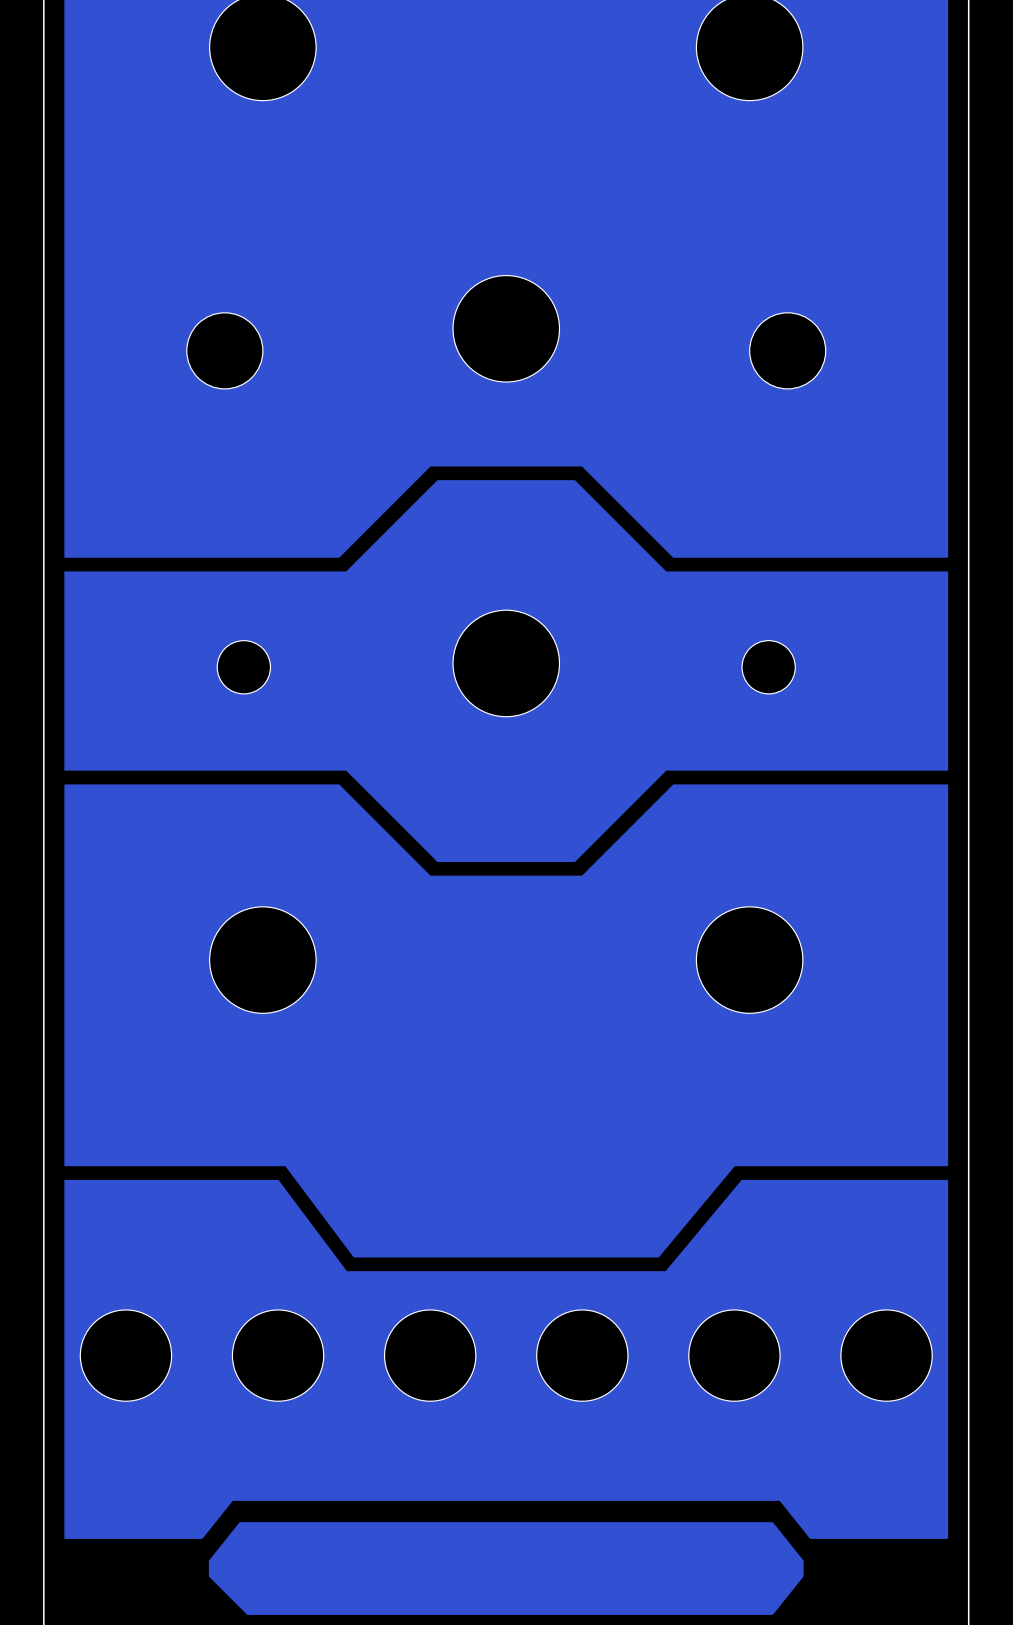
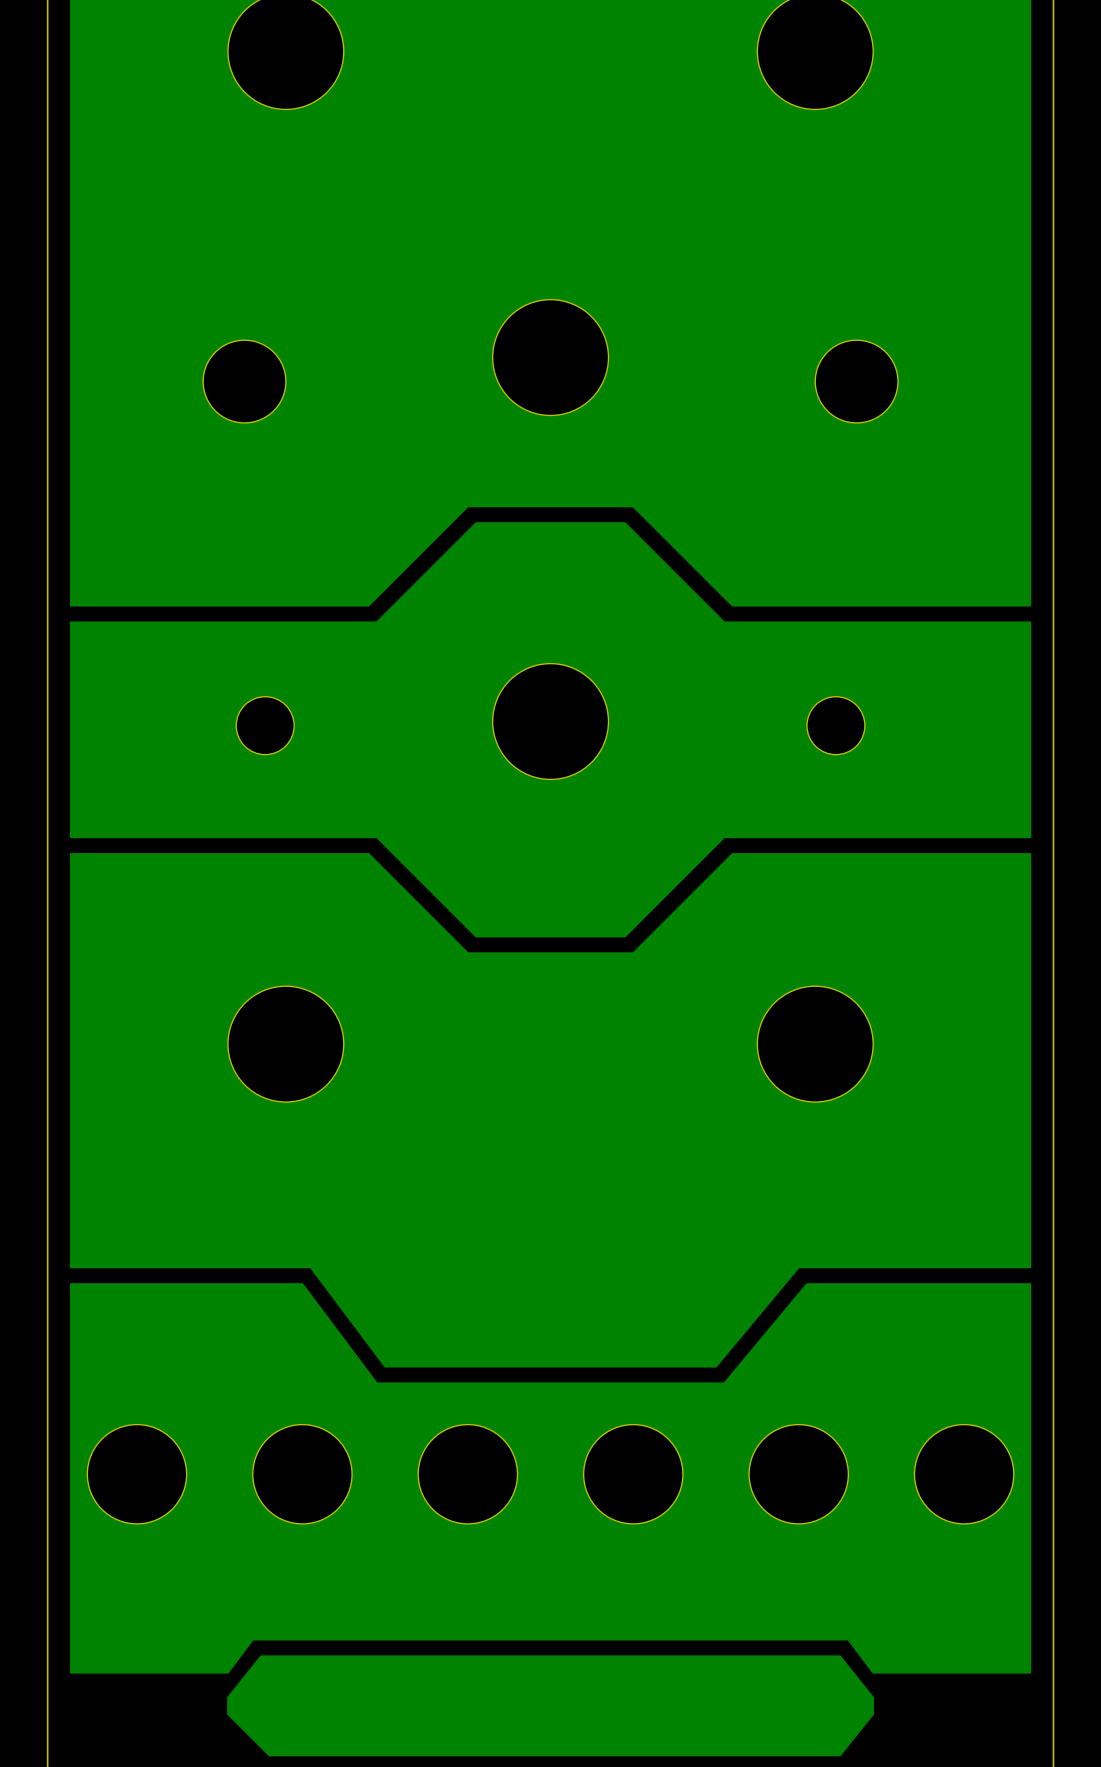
drawing shape: [64, 1179, 949, 1539] -> [69, 1283, 1032, 1674]

